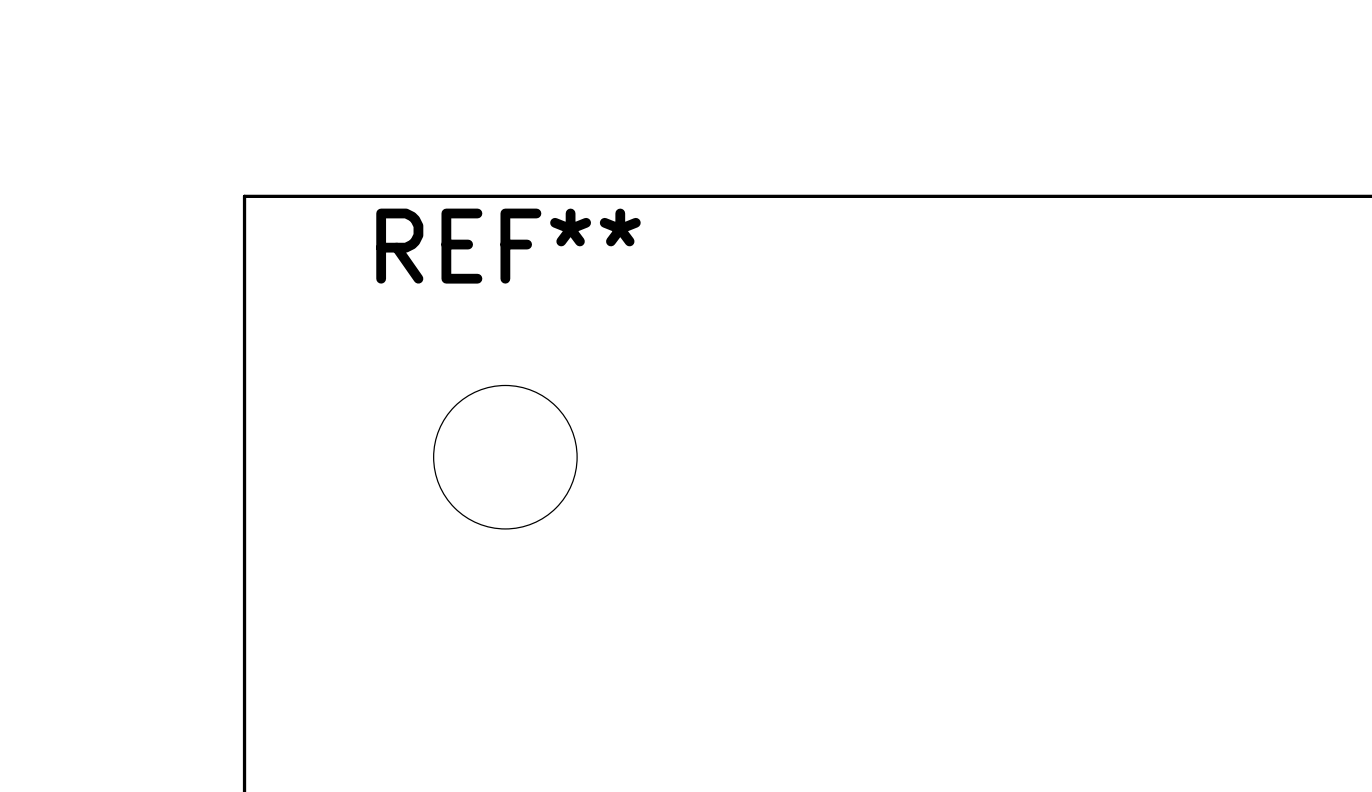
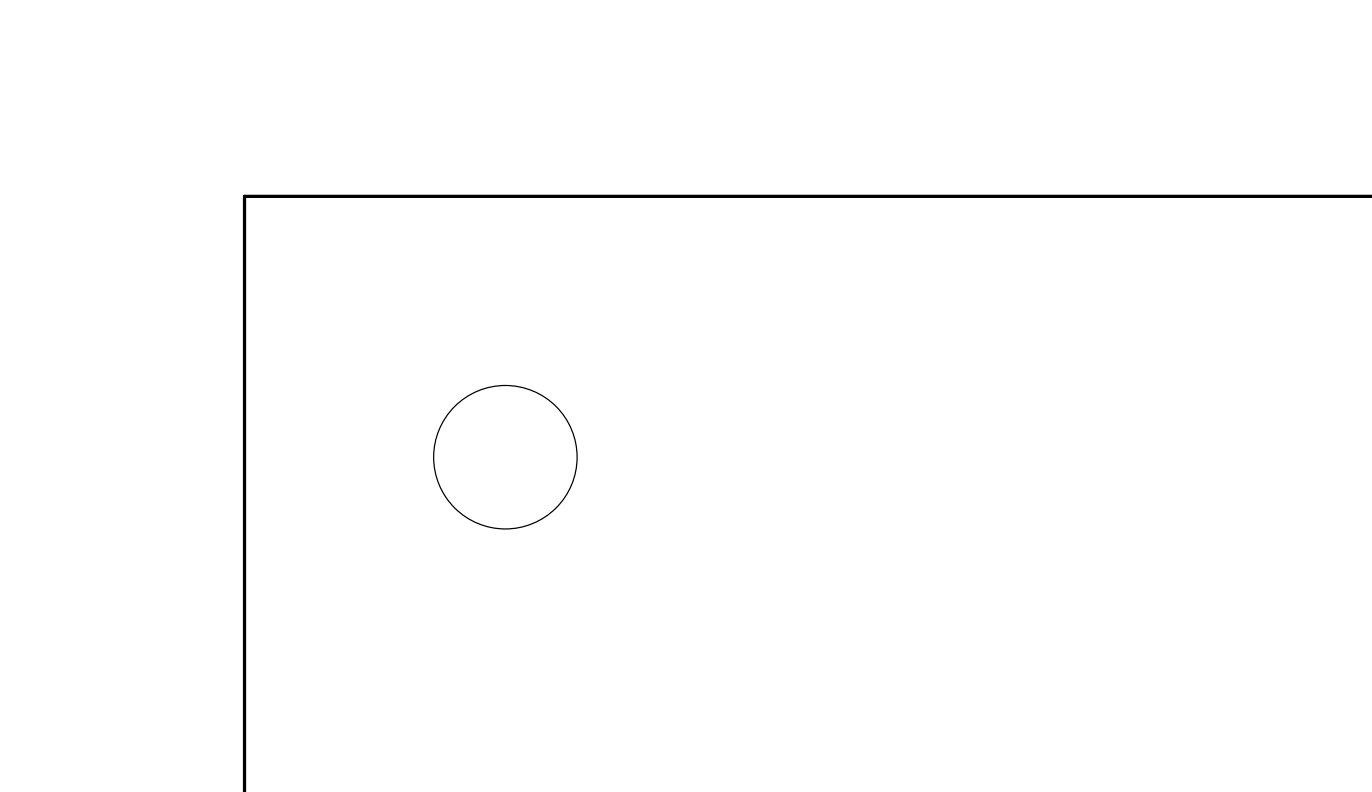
REF** name: REF** (508, 246) -> none

